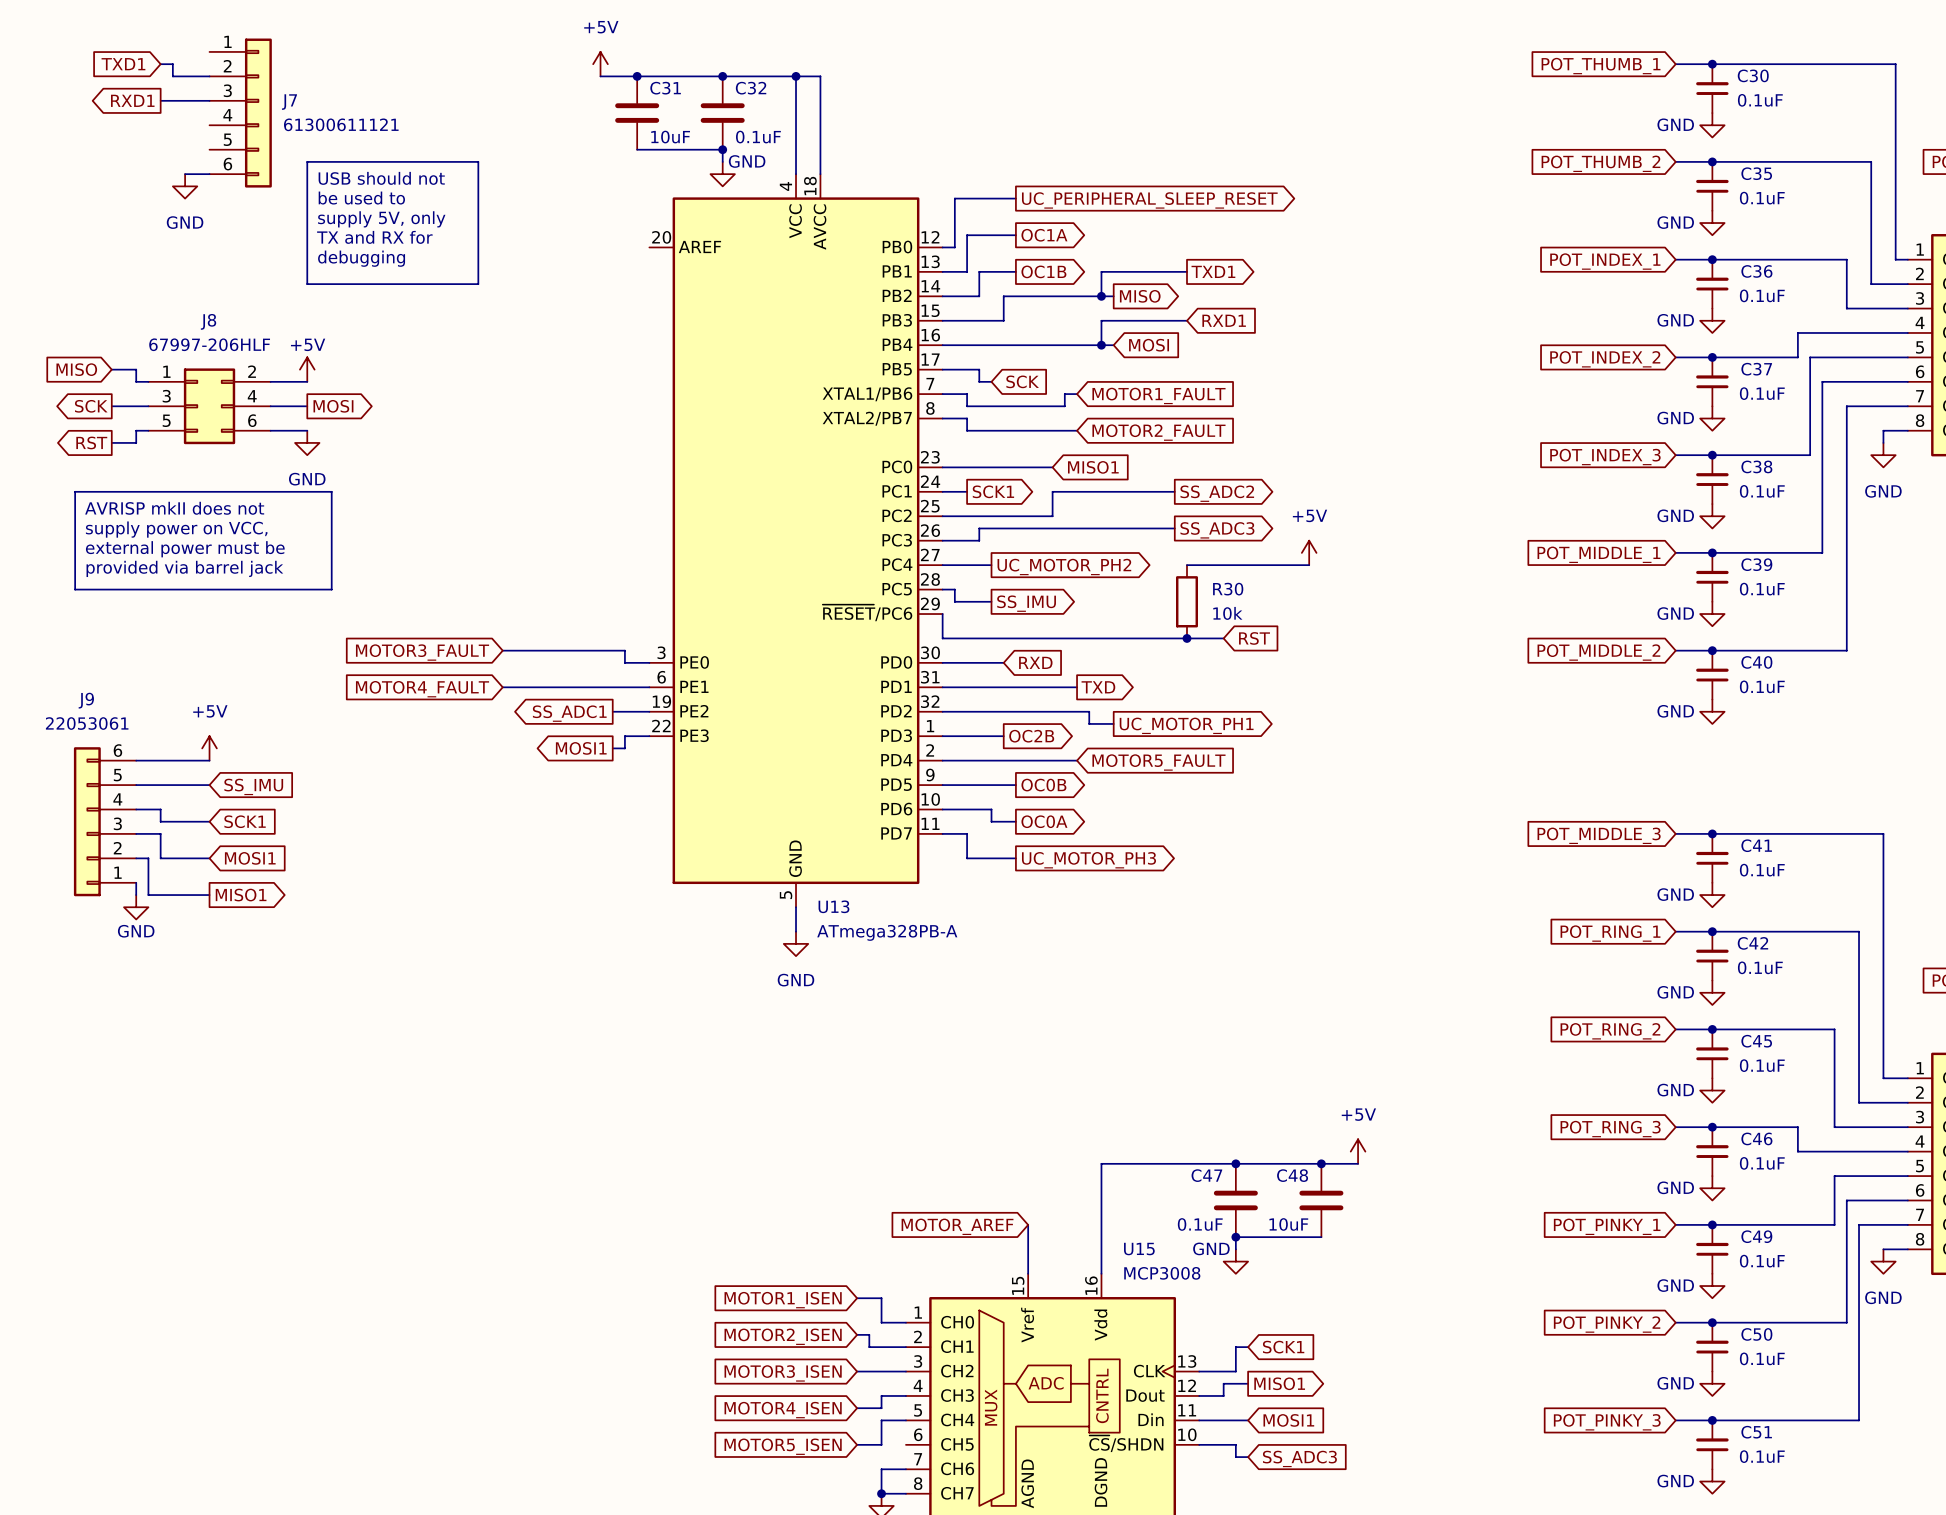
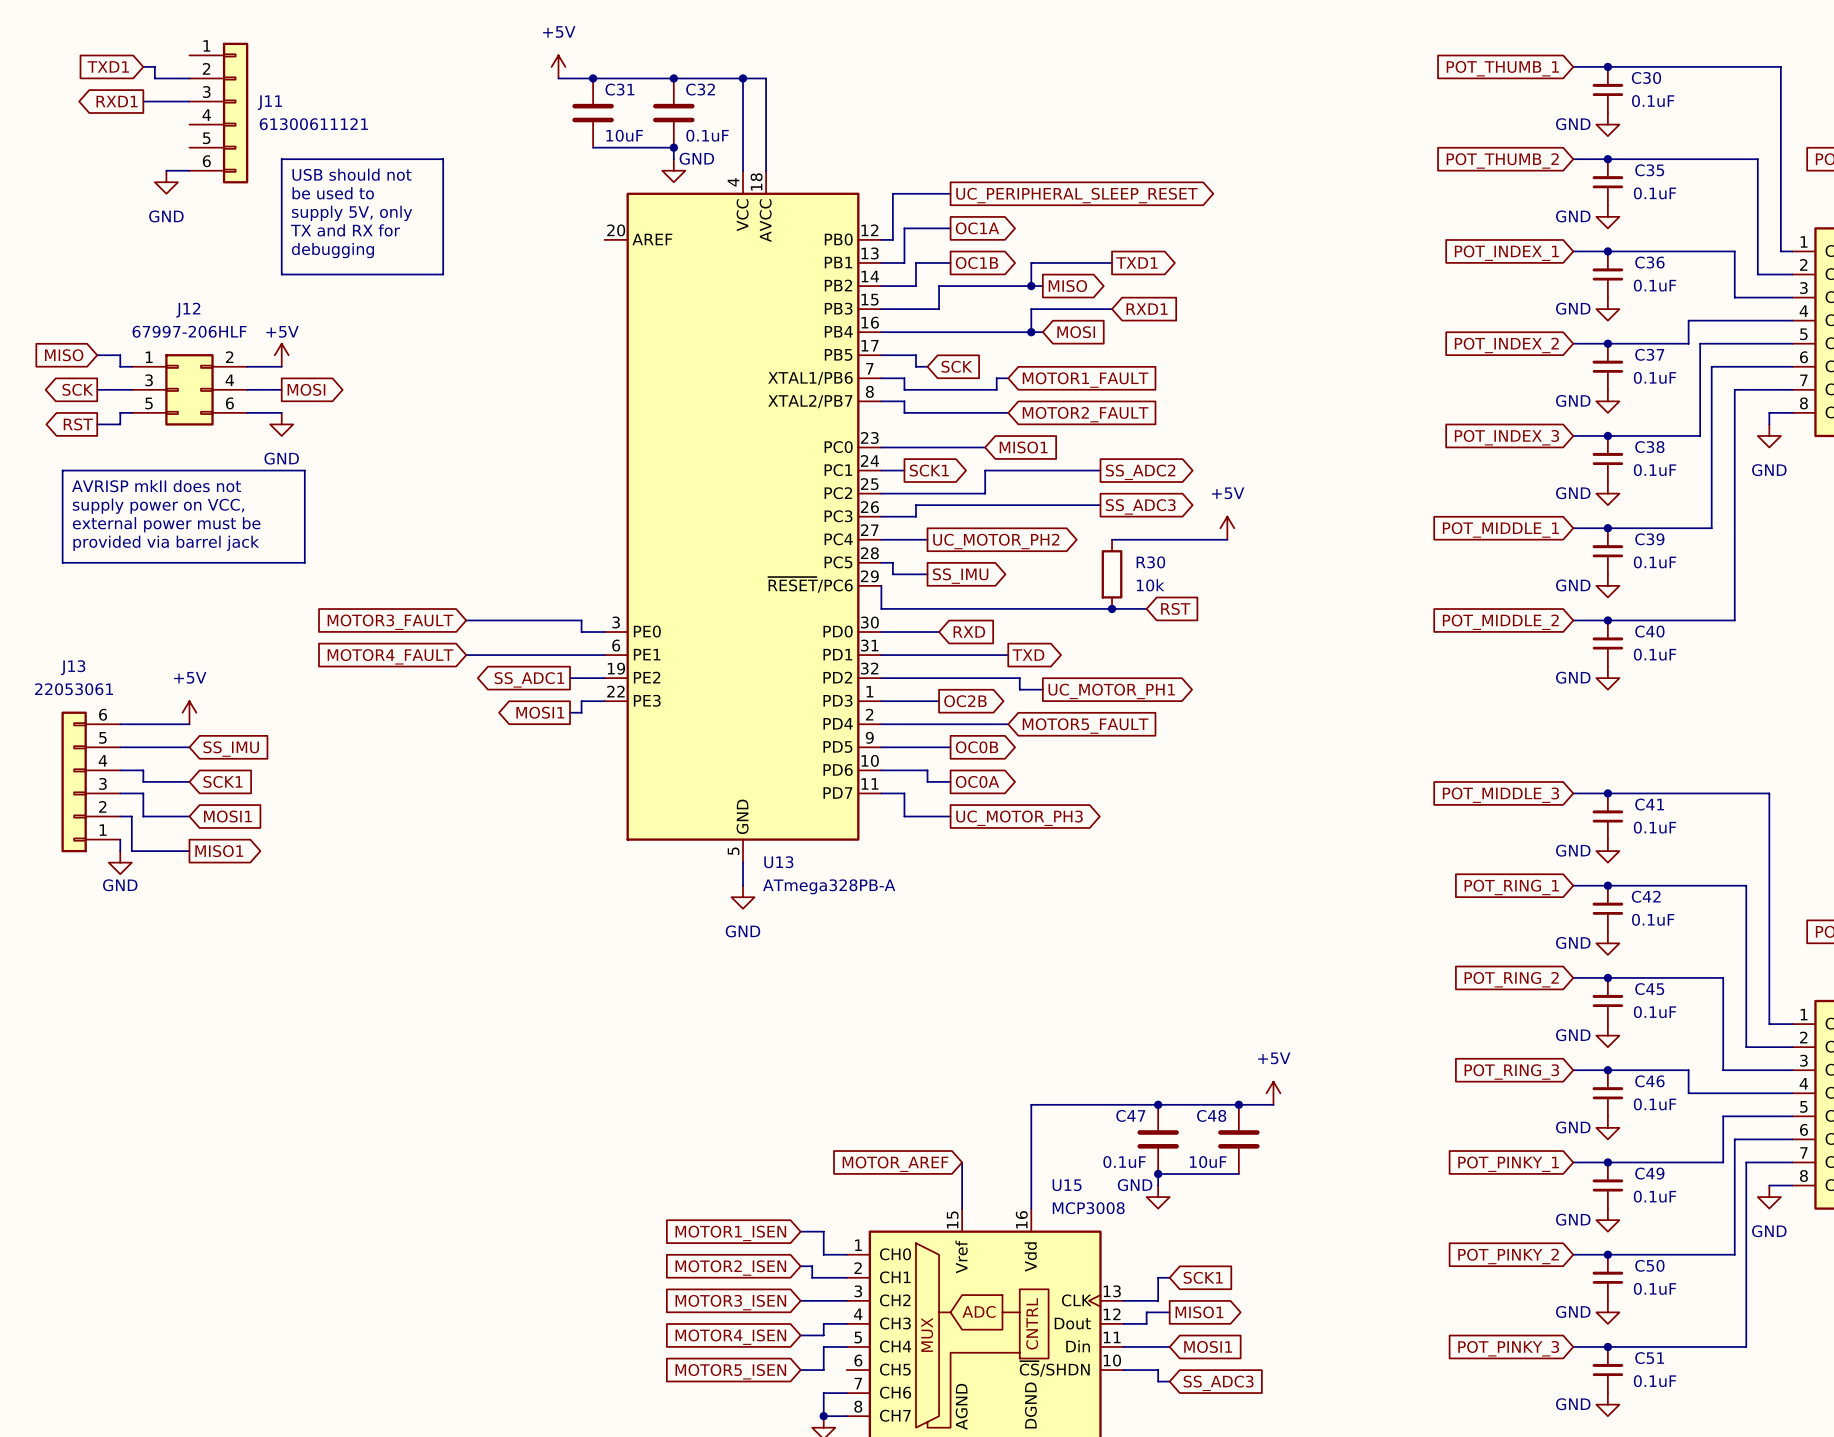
J7 name: J7 (289, 102) -> J11 (269, 102)
J8 name: J8 (208, 321) -> J12 (188, 310)
J9 name: J9 (86, 700) -> J13 (73, 667)

